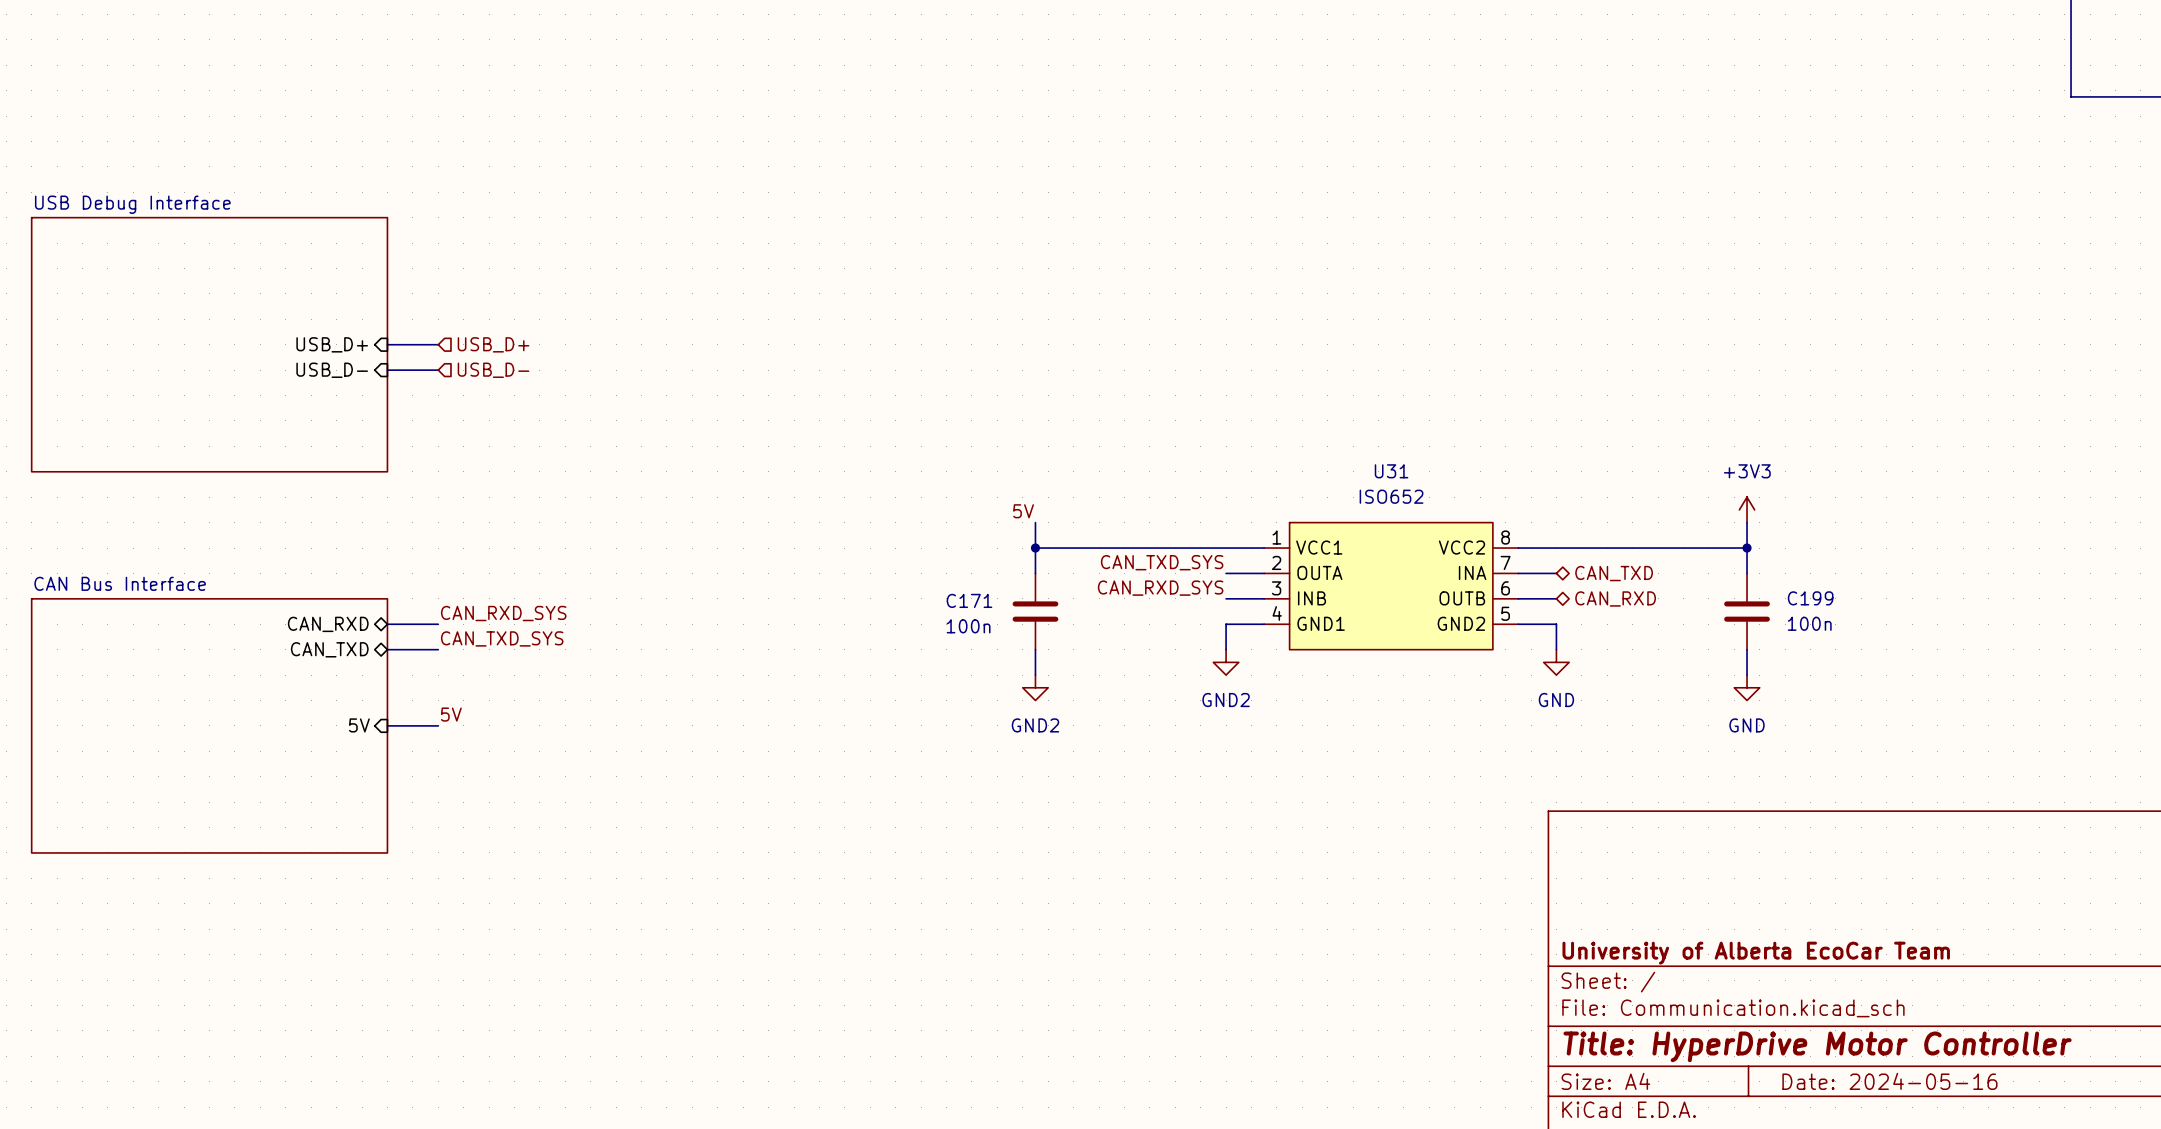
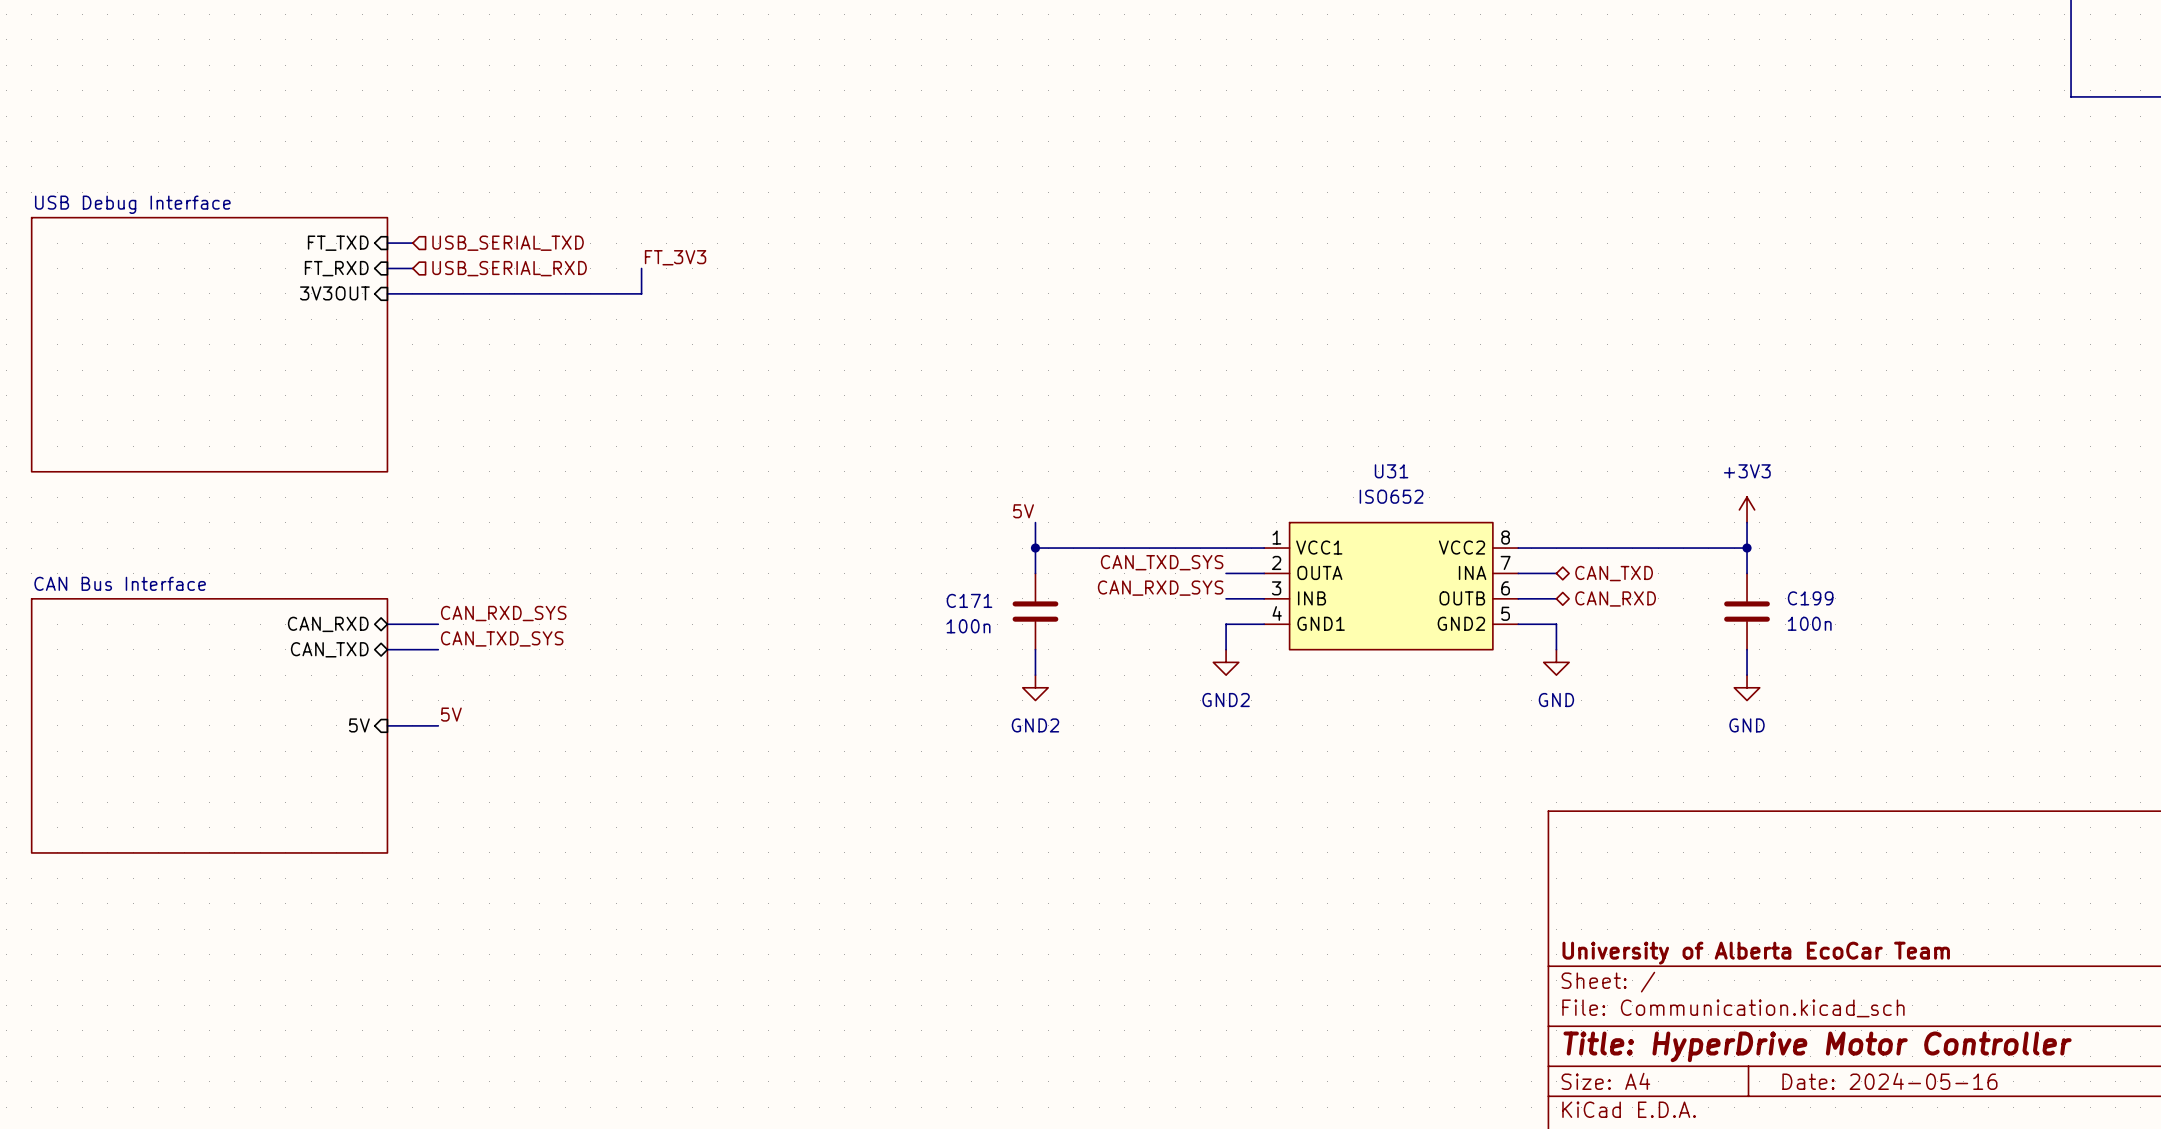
sheet pin: none -> FT_TXD (338, 243)
wire: none -> (387, 243) (412, 243)
hierarchical label: none -> USB_SERIAL_TXD (508, 243)
label: none -> FT_3V3 (675, 257)
sheet pin: none -> FT_RXD (336, 268)
wire: none -> (387, 268) (412, 268)
hierarchical label: none -> USB_SERIAL_RXD (509, 268)
wire: none -> (641, 268) (641, 293) (387, 293)
sheet pin: none -> 3V3OUT (334, 293)
sheet pin: USB_D+ (332, 344) -> none
wire: (387, 344) (438, 344) -> none
hierarchical label: USB_D+ (493, 344) -> none
sheet pin: USB_D- (332, 370) -> none
wire: (387, 370) (438, 370) -> none
hierarchical label: USB_D- (493, 370) -> none

